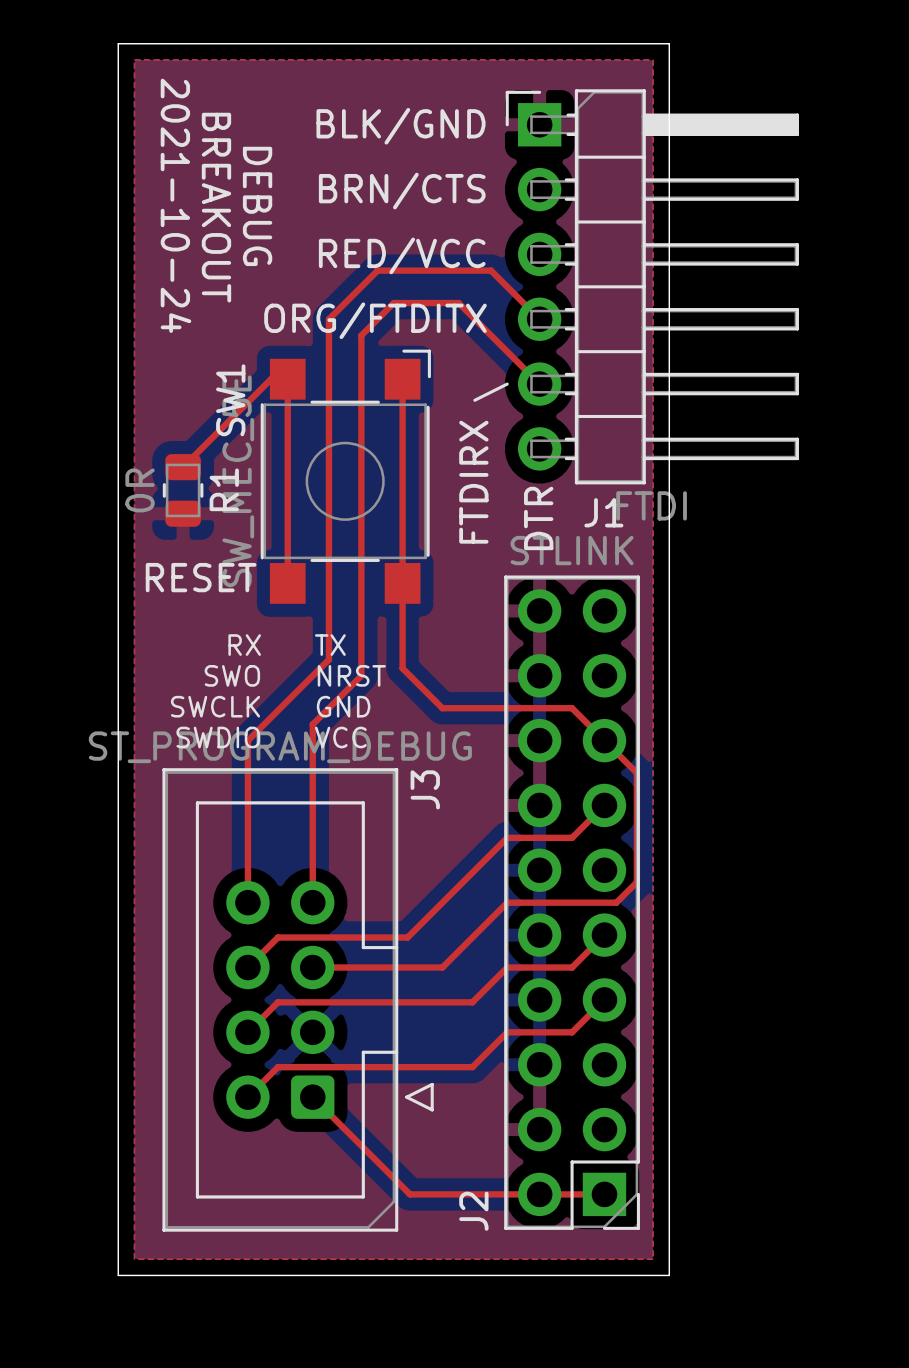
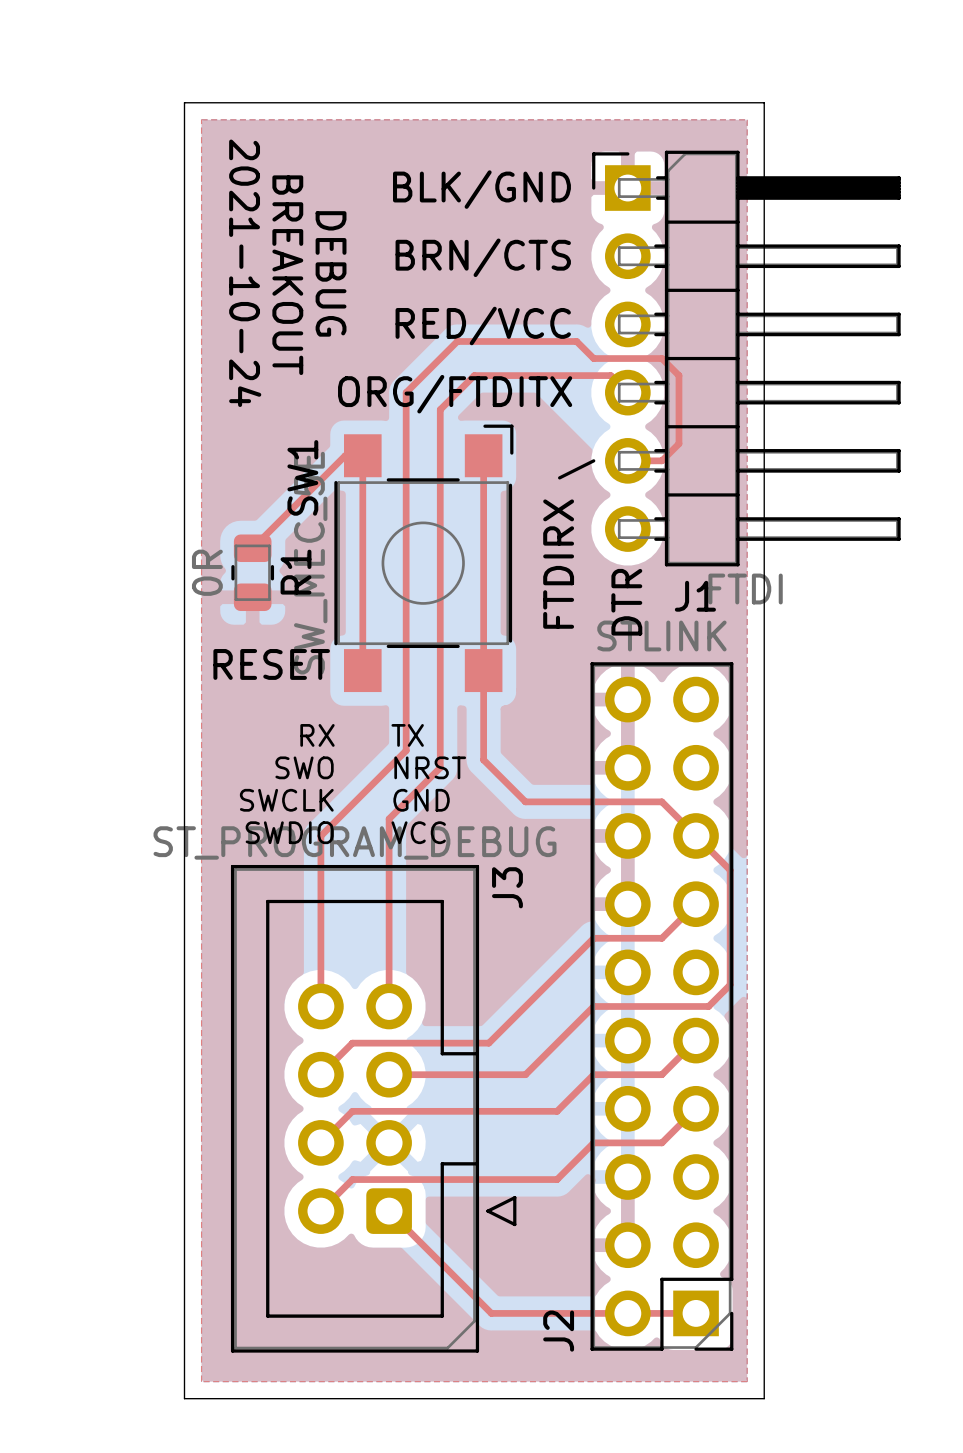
top track: (507, 286) (523, 303) -> (542, 375) (610, 375)
top track: (458, 303) (539, 384) -> (593, 358) (661, 358) (678, 375) (678, 443) (661, 460) (627, 460)

